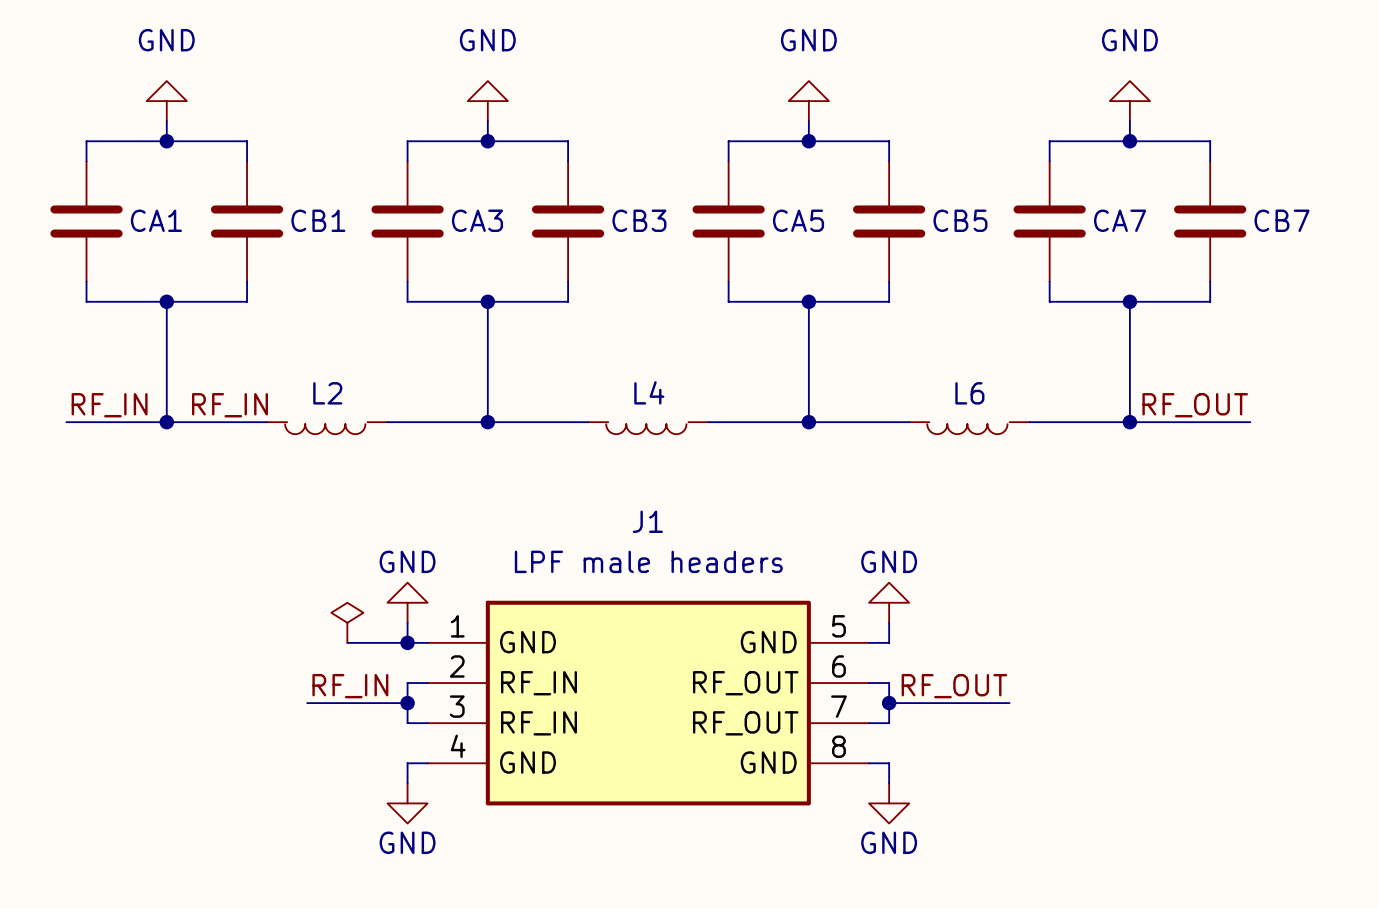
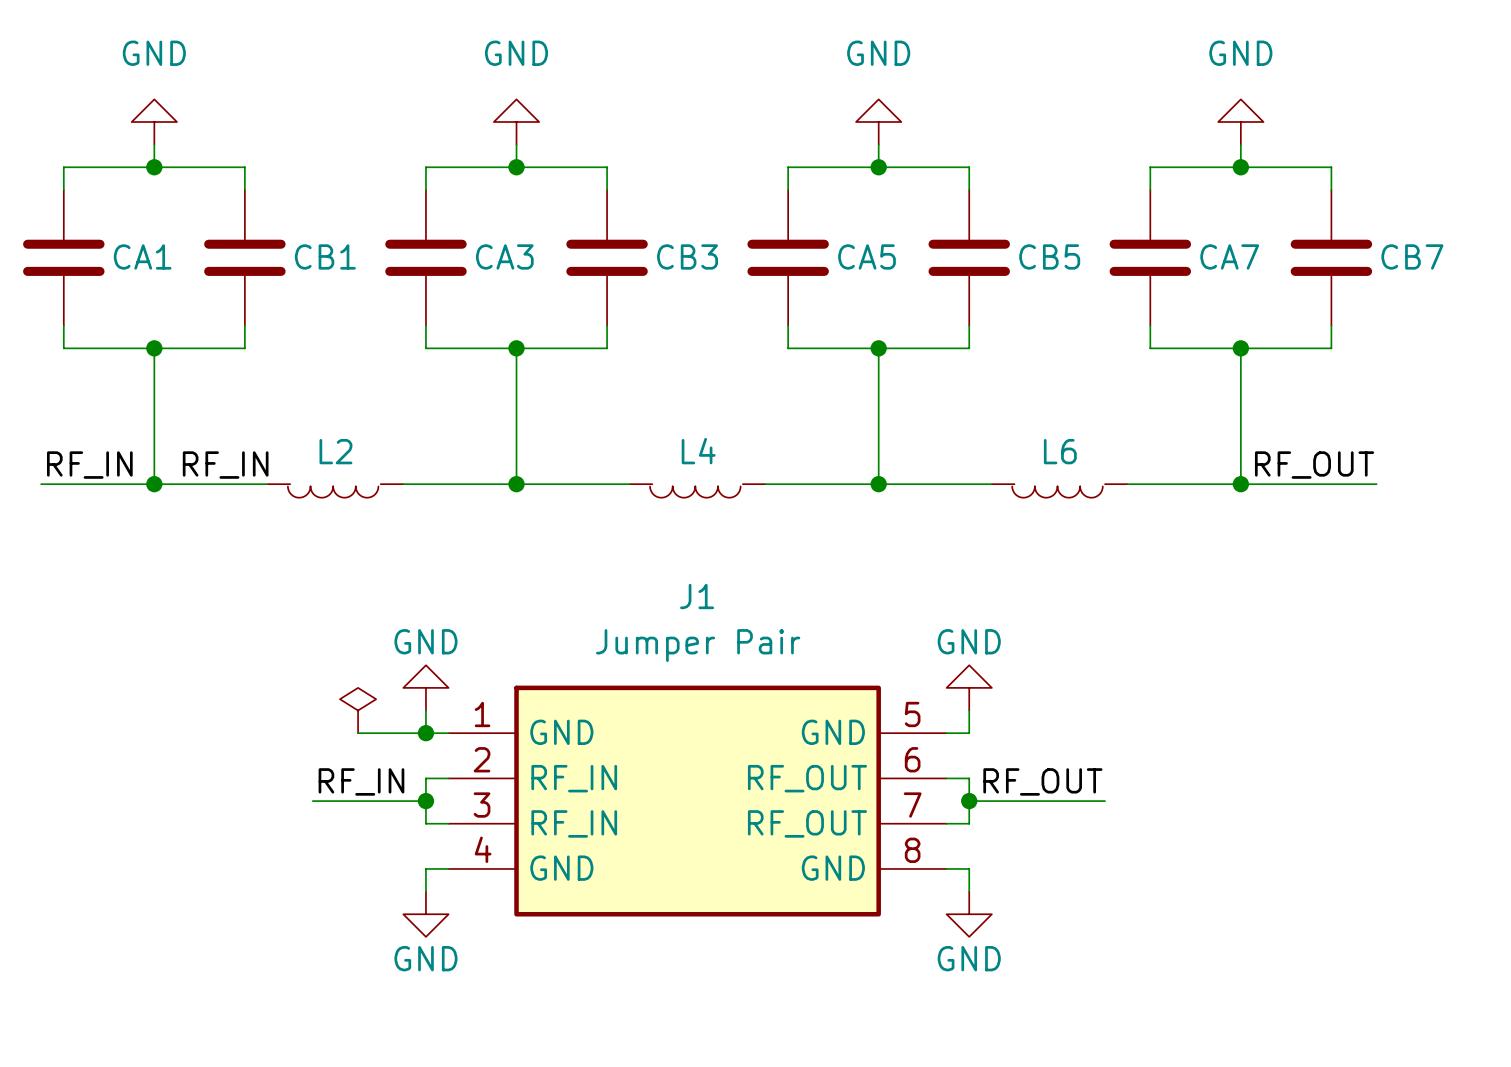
J1 value: LPF male headers (648, 561) -> Jumper Pair (698, 645)

